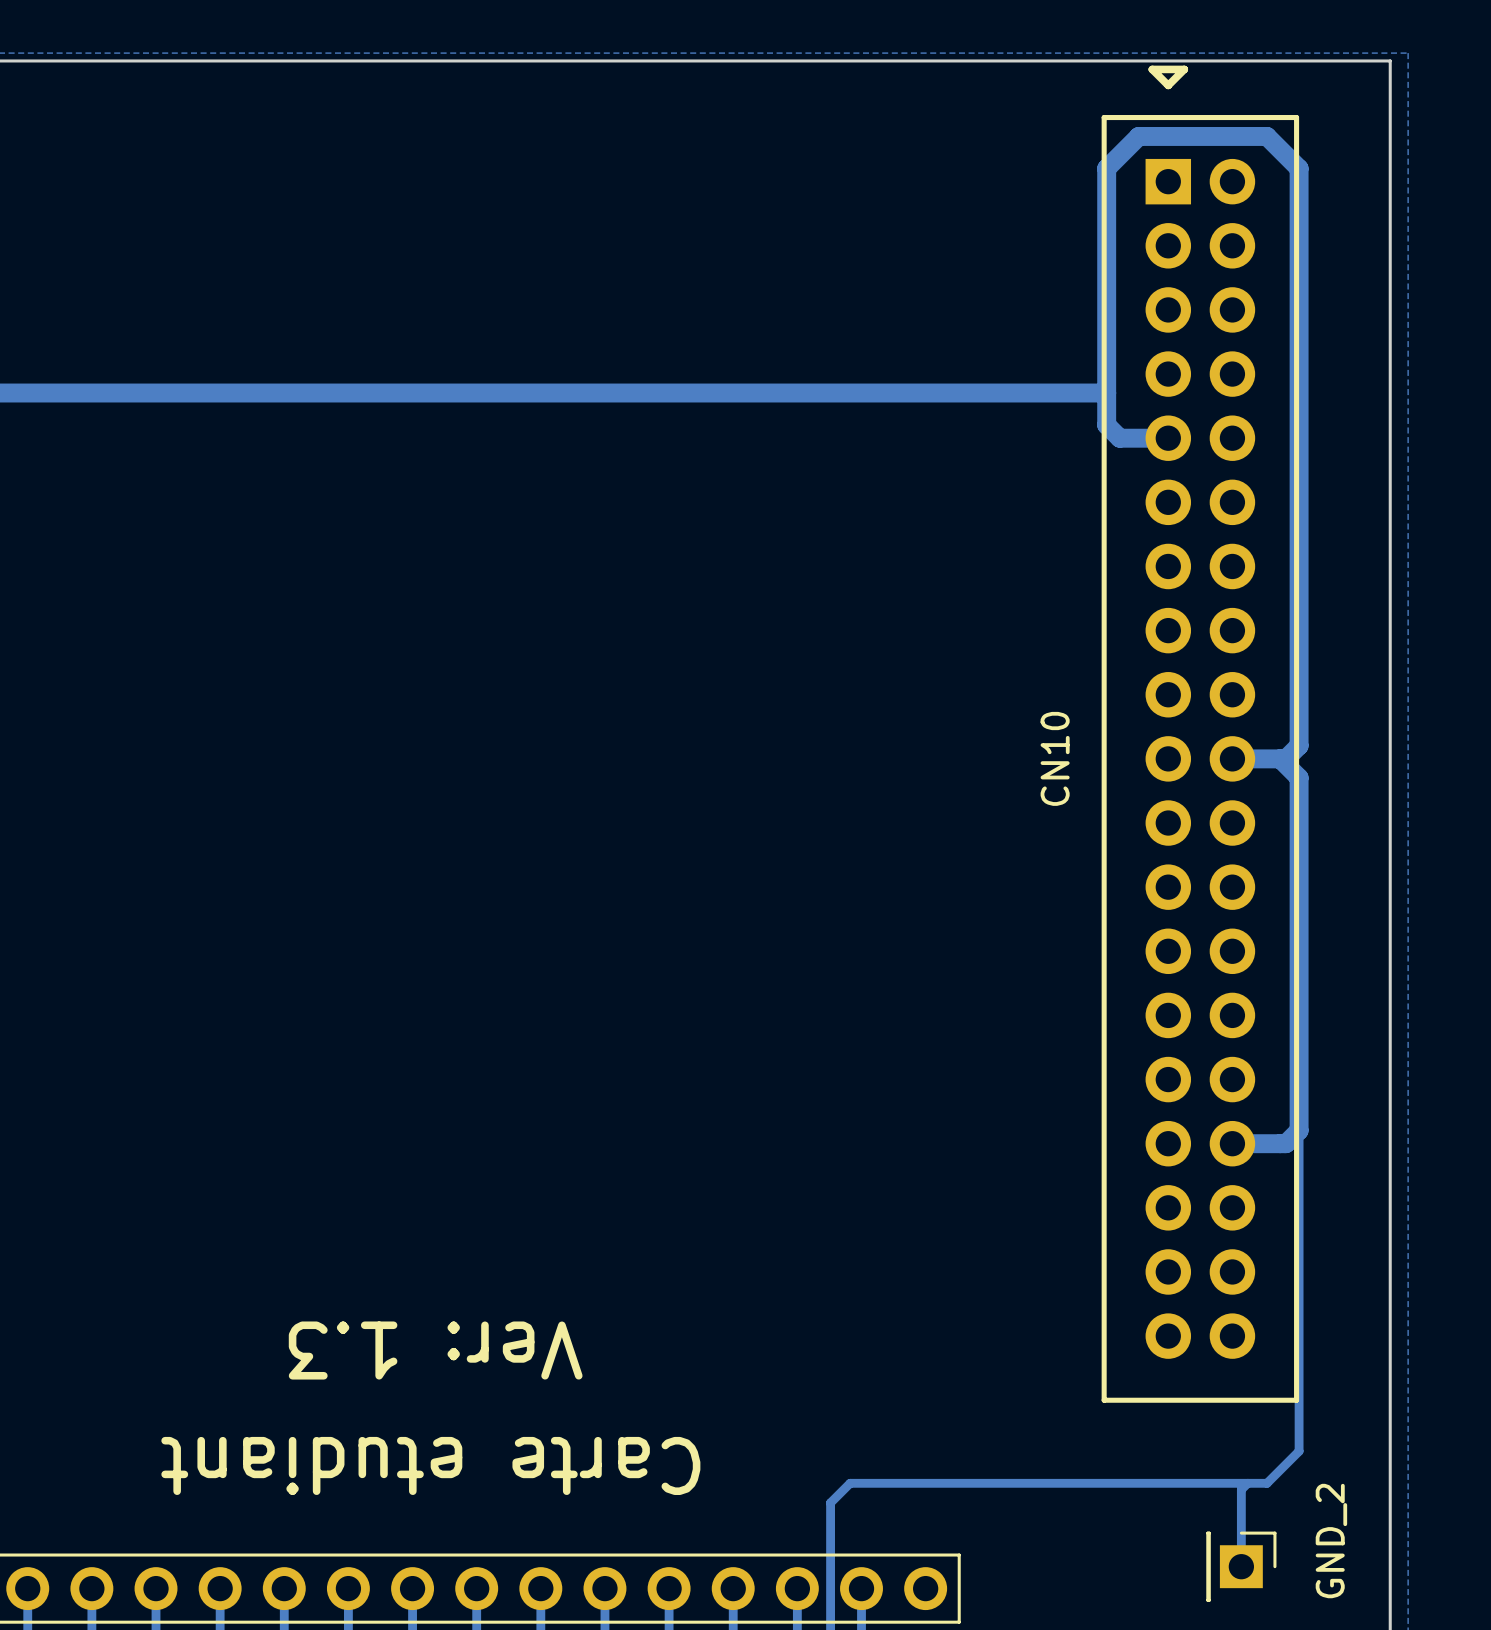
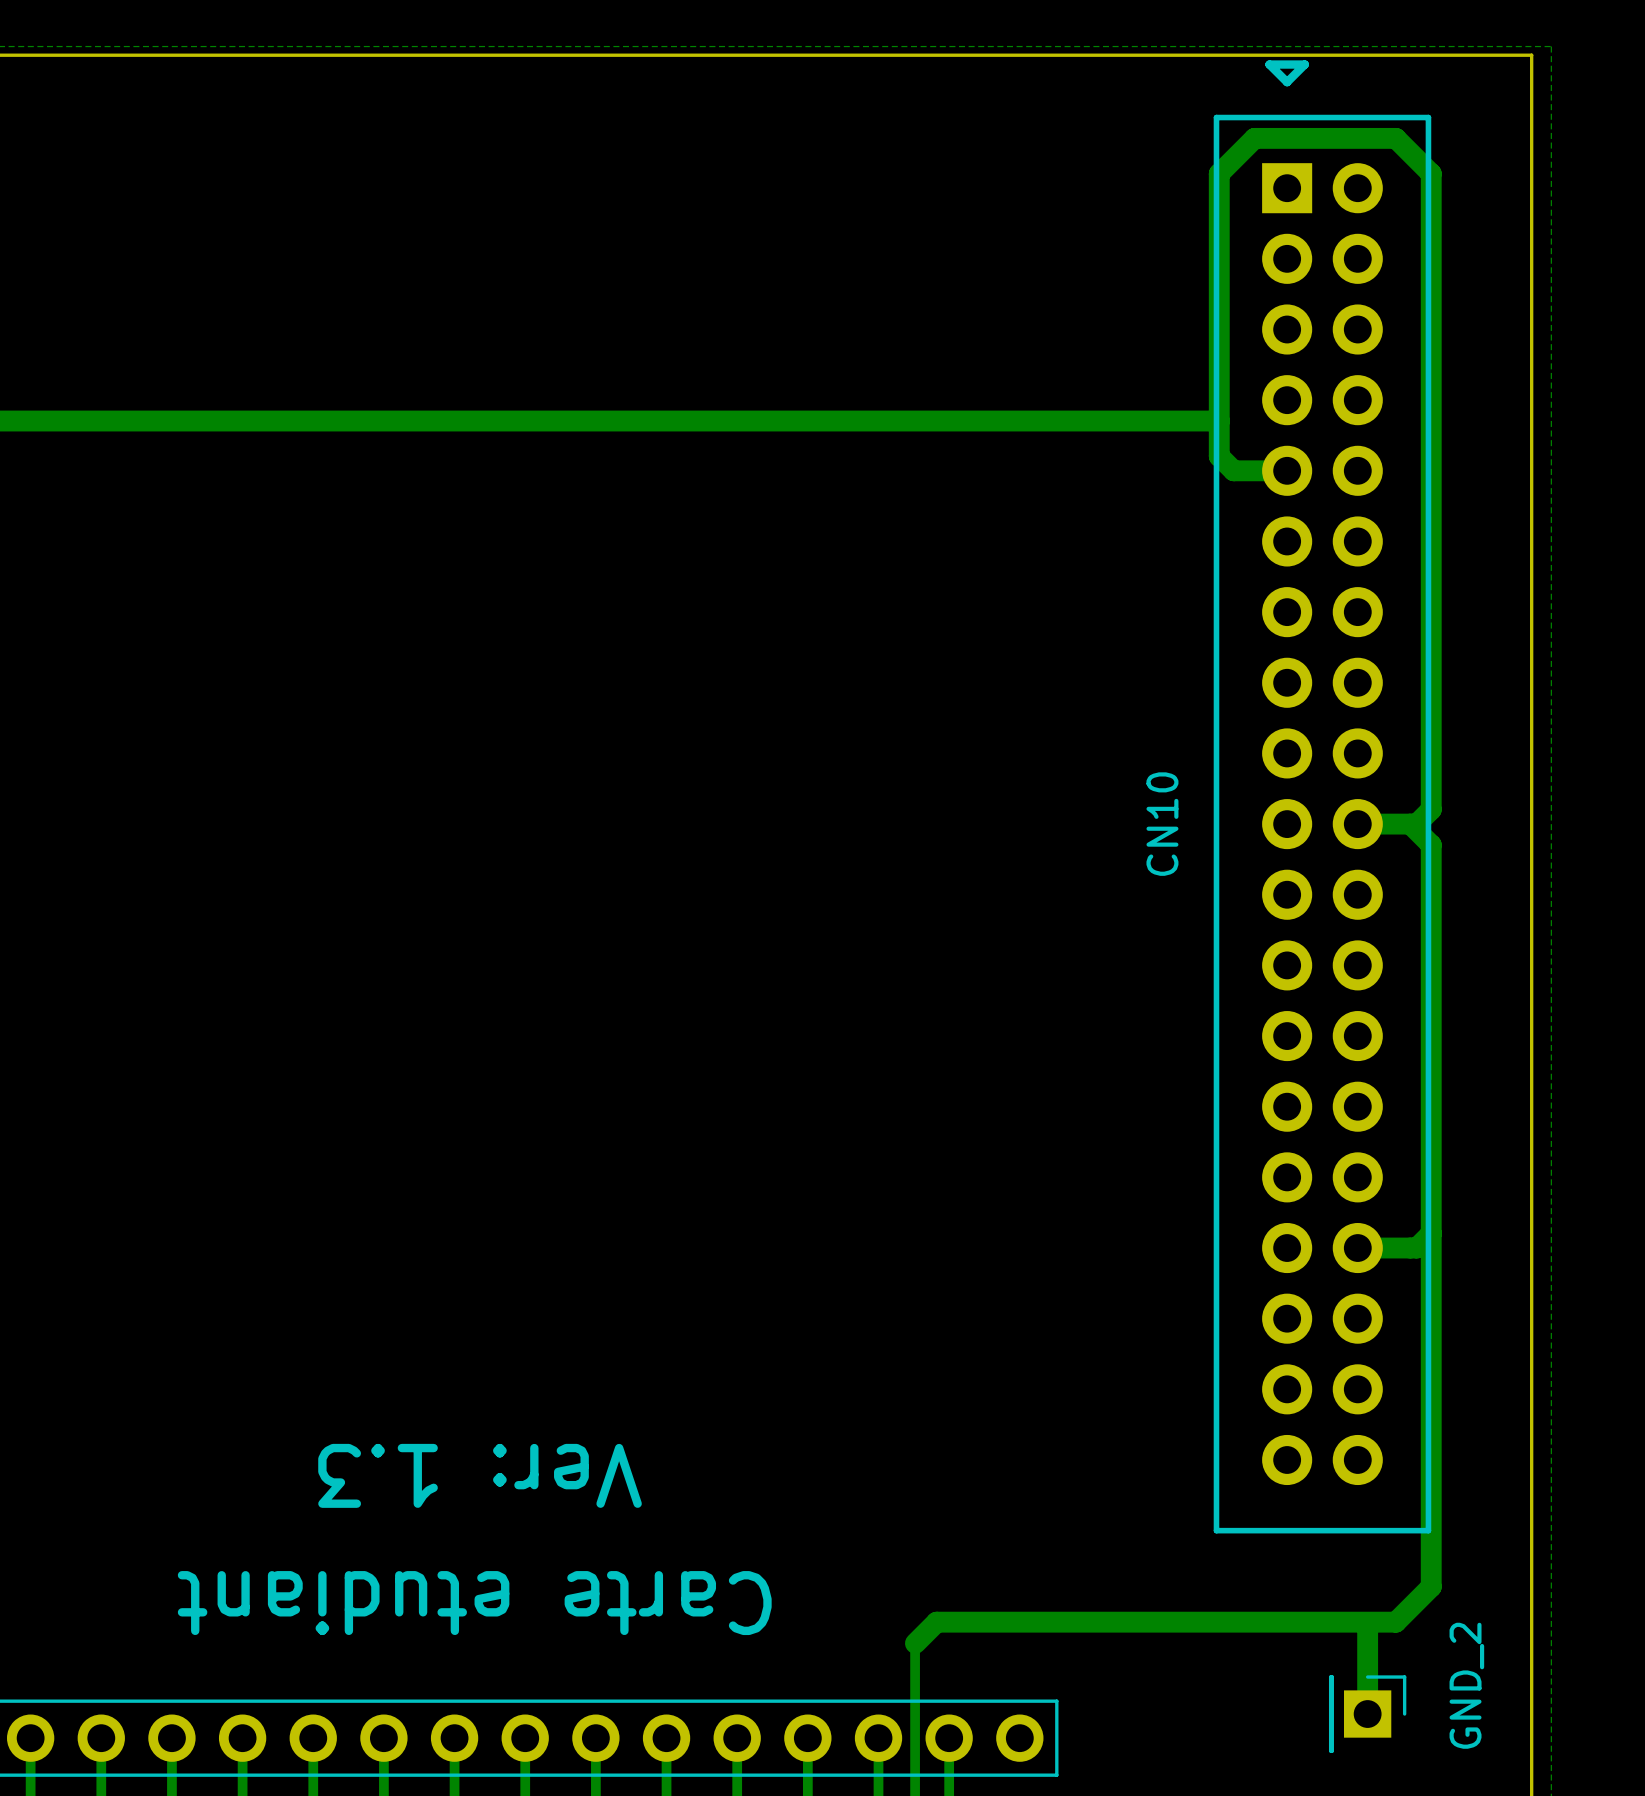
bottom track width: thin (1299, 1130) (1299, 1451) (1267, 1483) (850, 1483) (830, 1502) -> thick (1431, 1233) (1431, 1586) (1395, 1622) (936, 1622) (915, 1643)
bottom track width: thin (1241, 1489) (1241, 1566) -> thick (1367, 1629) (1367, 1714)

